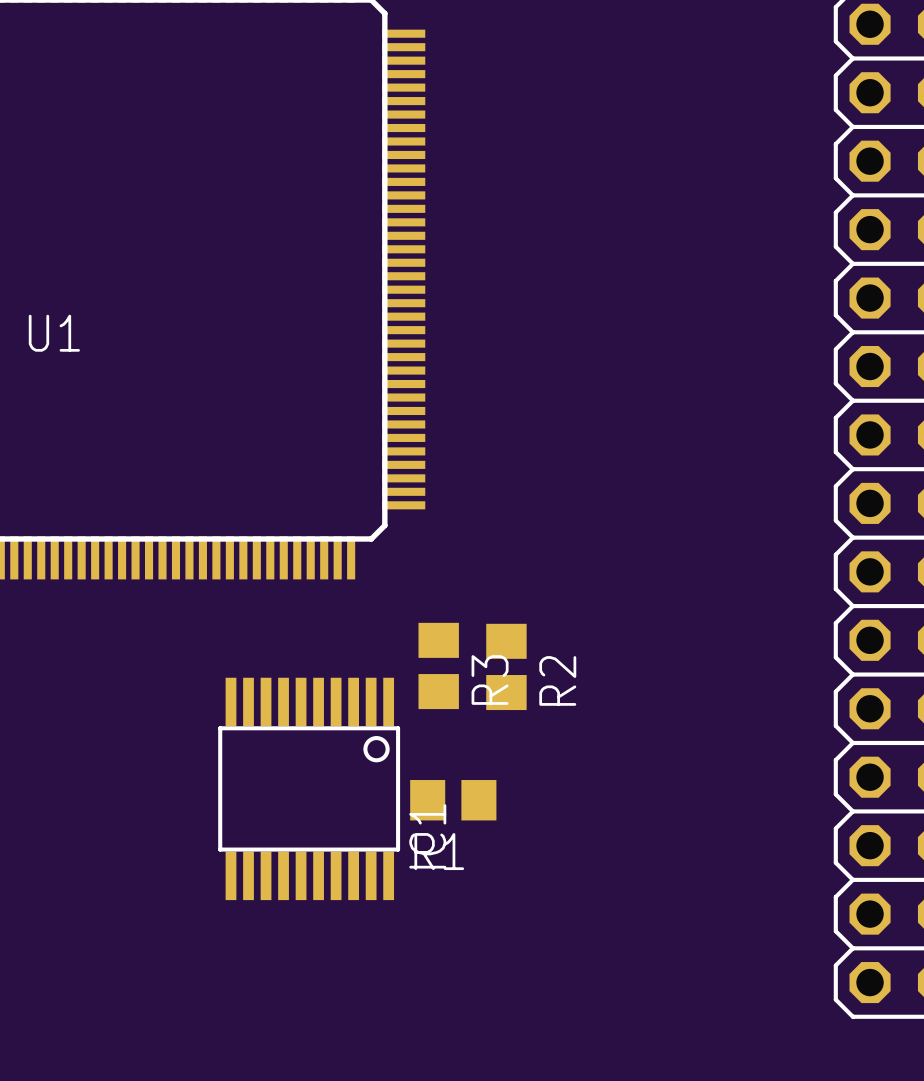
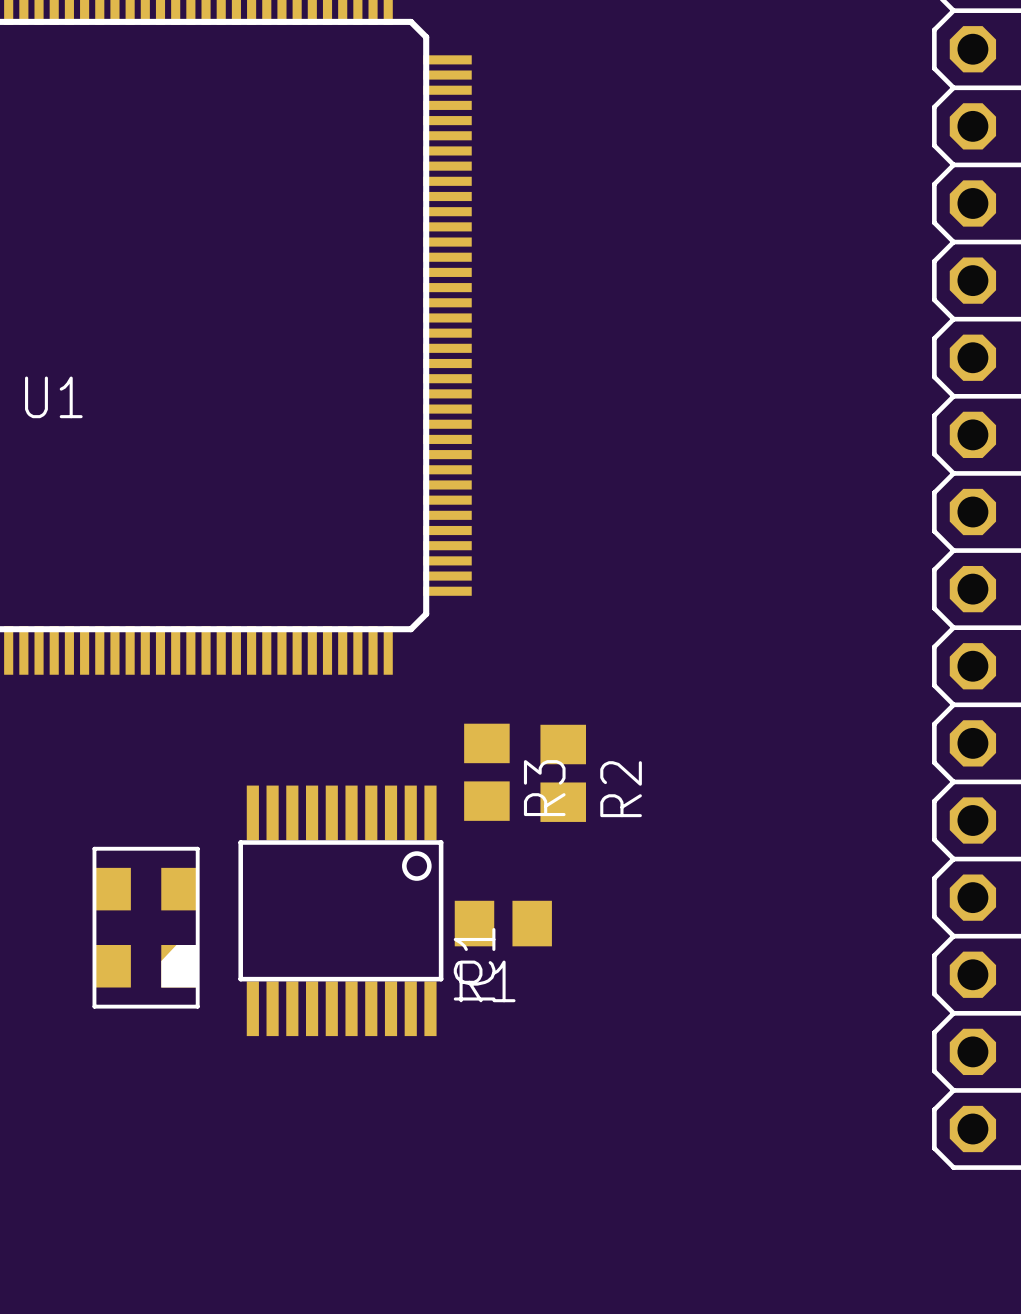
part: none -> (146, 927)

